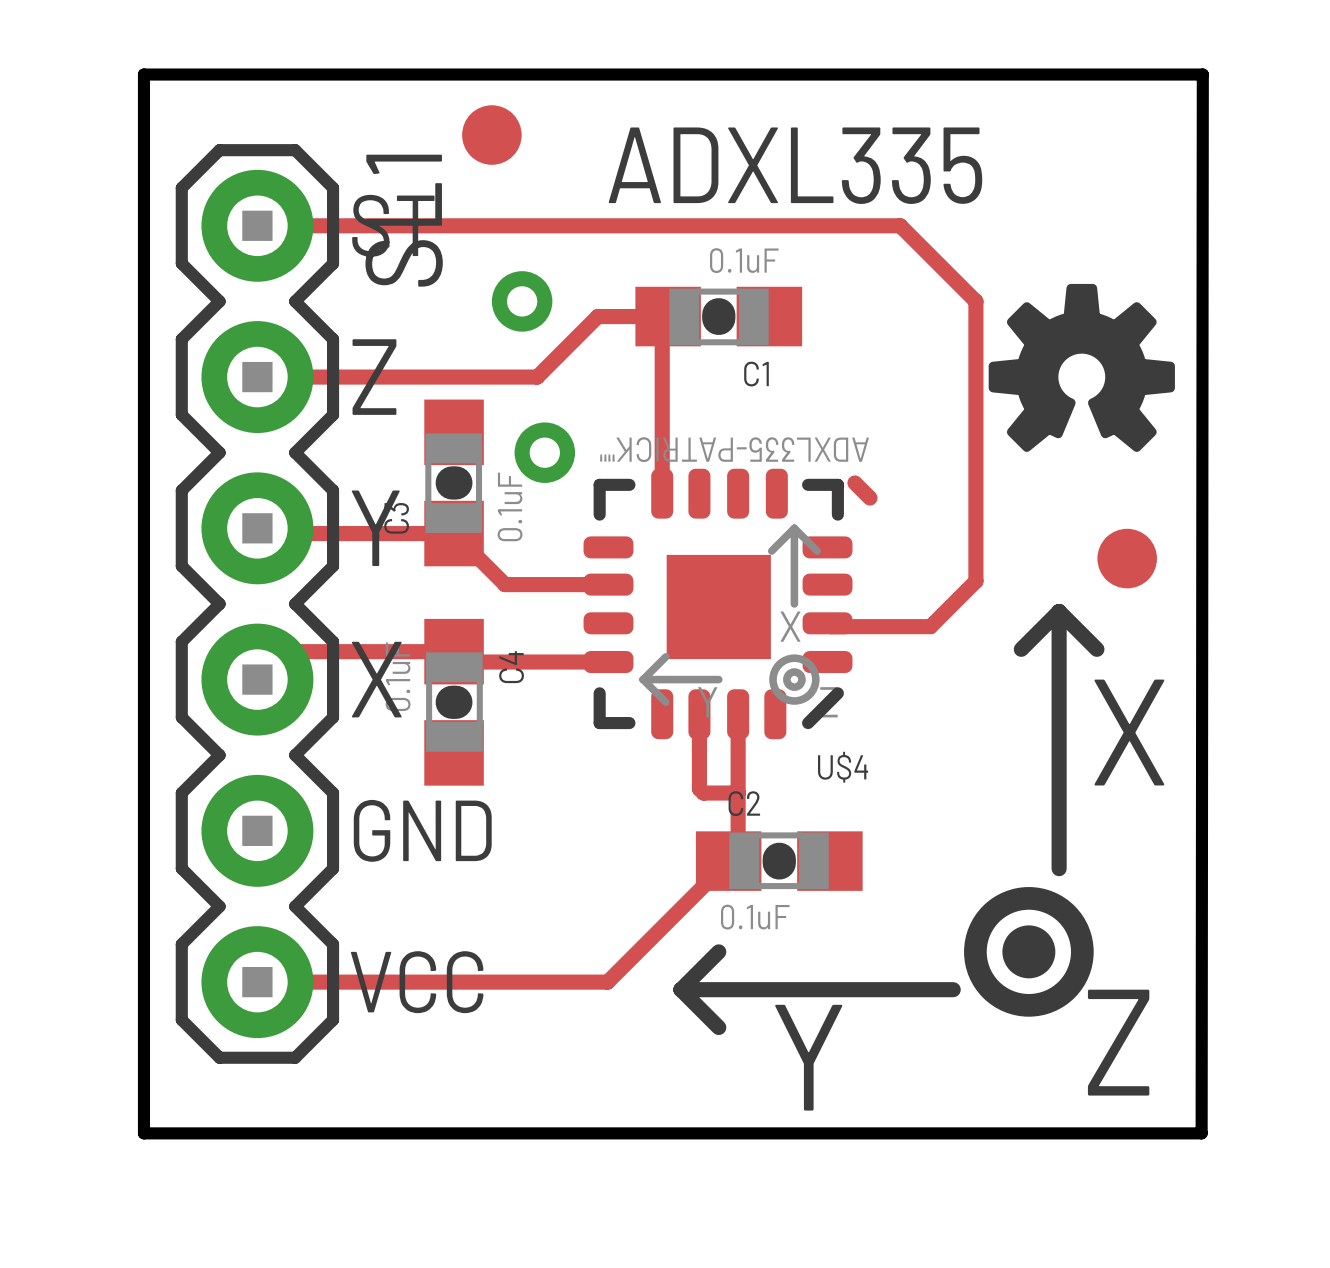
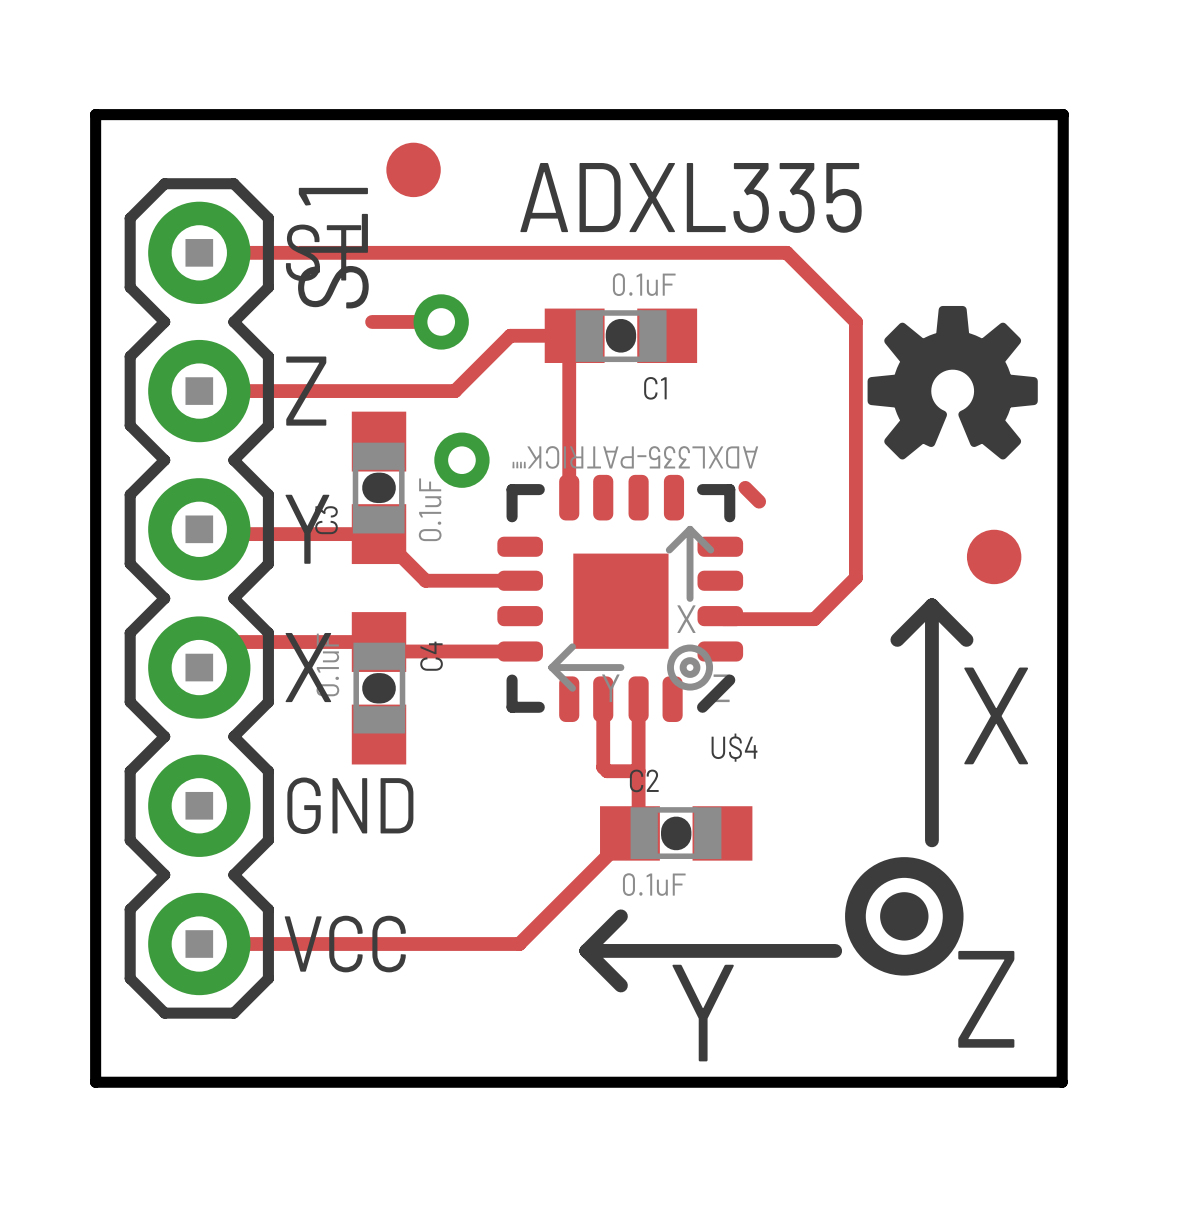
track: none -> (372, 321) (441, 321)

